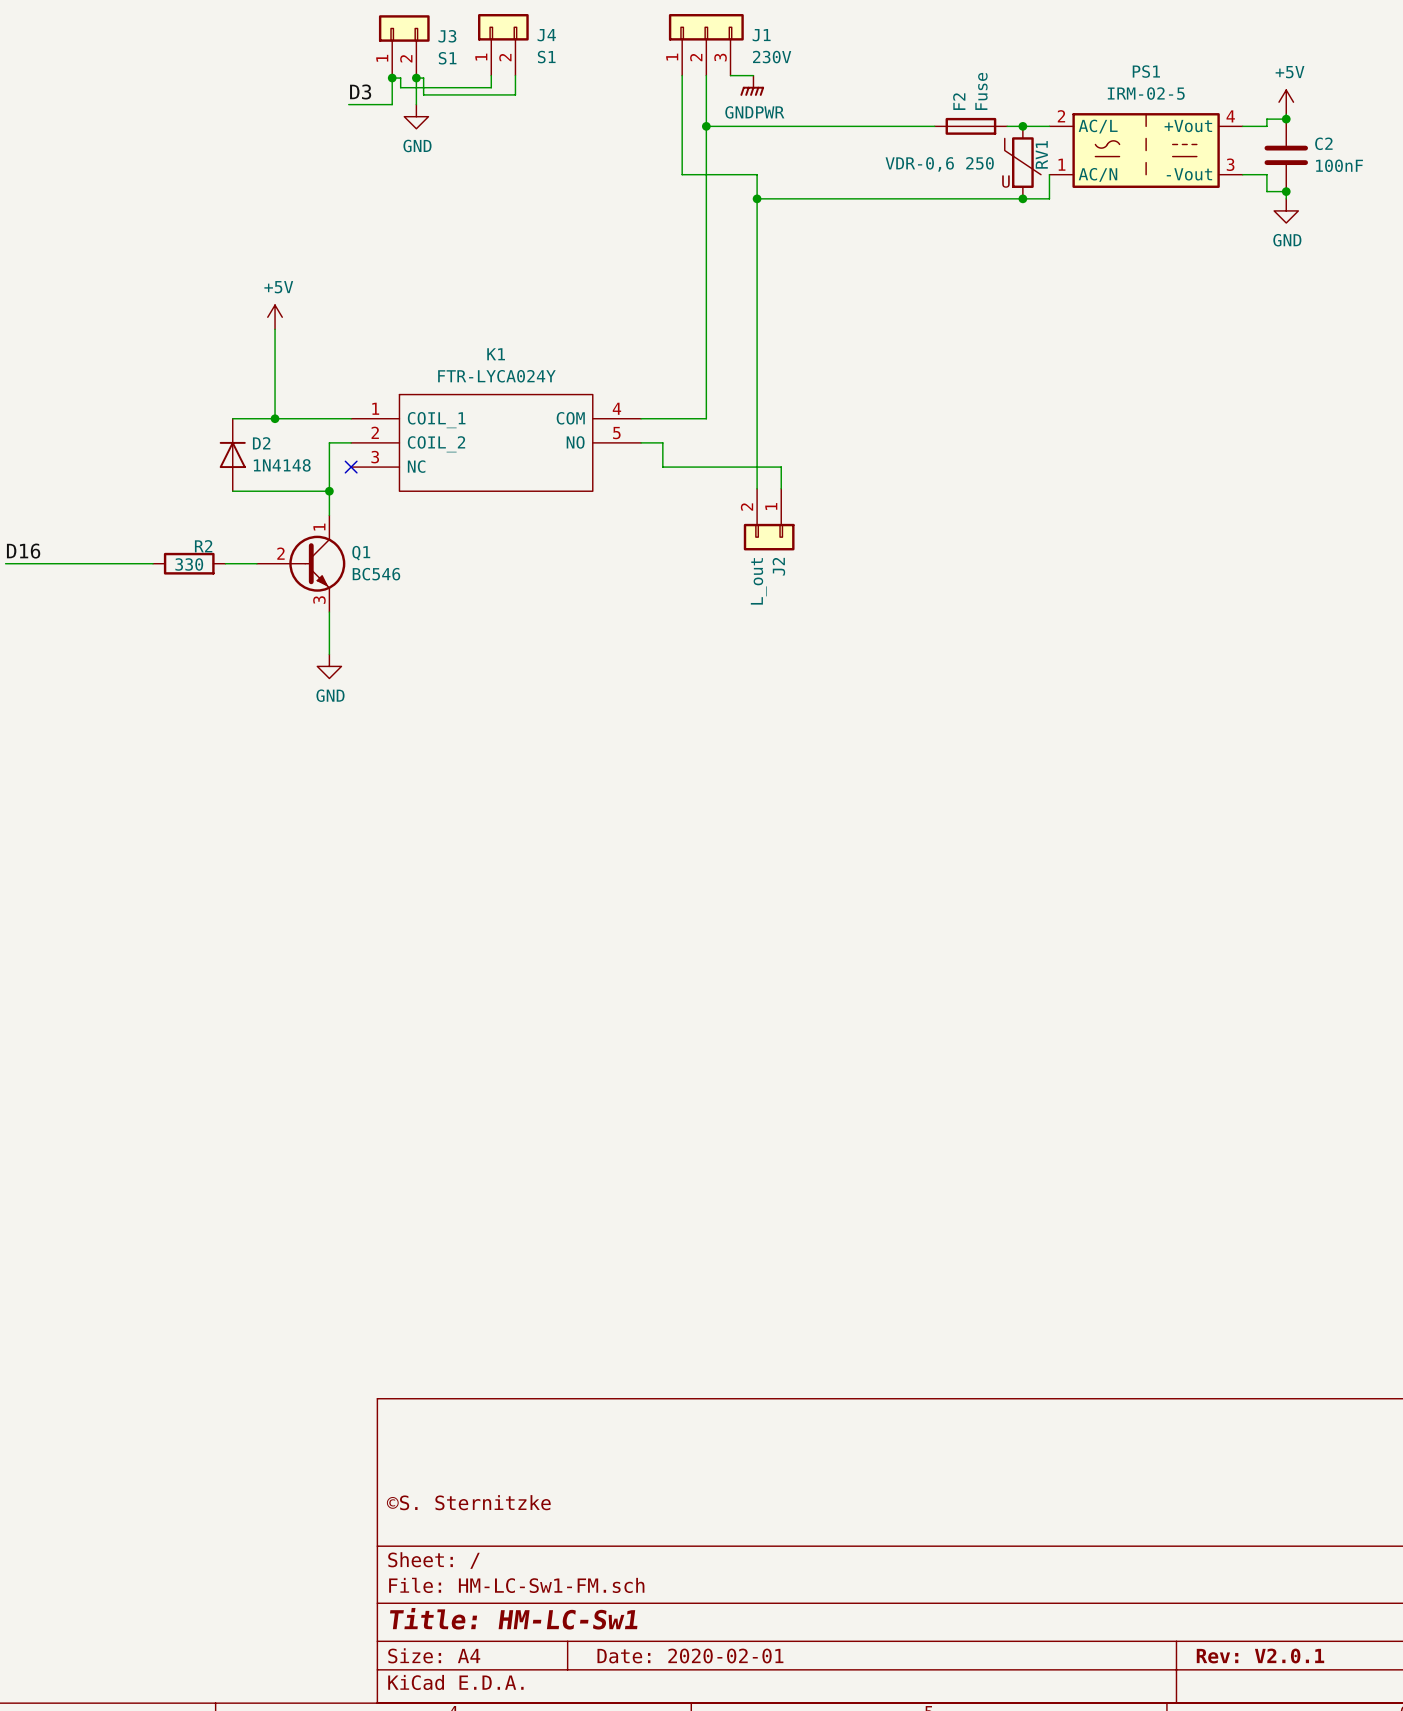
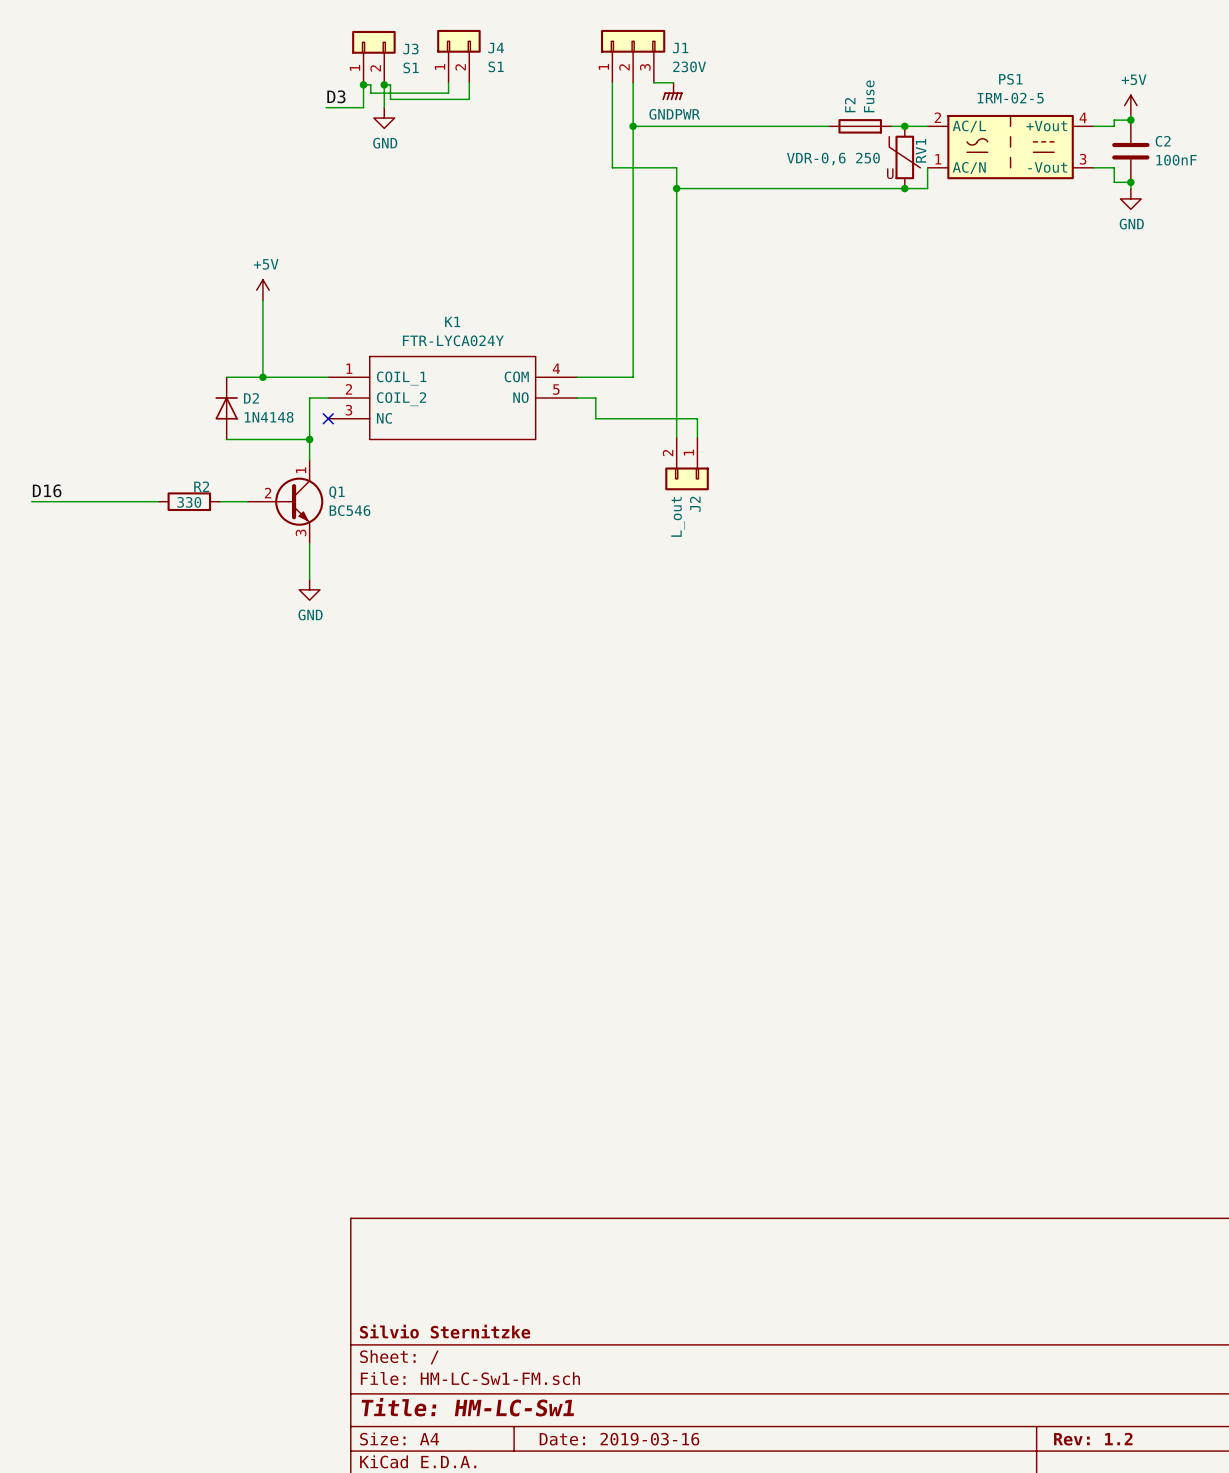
title block: ©S. Sternitzke (468, 1502) -> Silvio Sternitzke (445, 1331)
title block: Date: 2020-02-01 (690, 1656) -> Date: 2019-03-16 (619, 1439)
title block: Rev: V2.0.1 (1260, 1656) -> Rev: 1.2 (1093, 1439)

